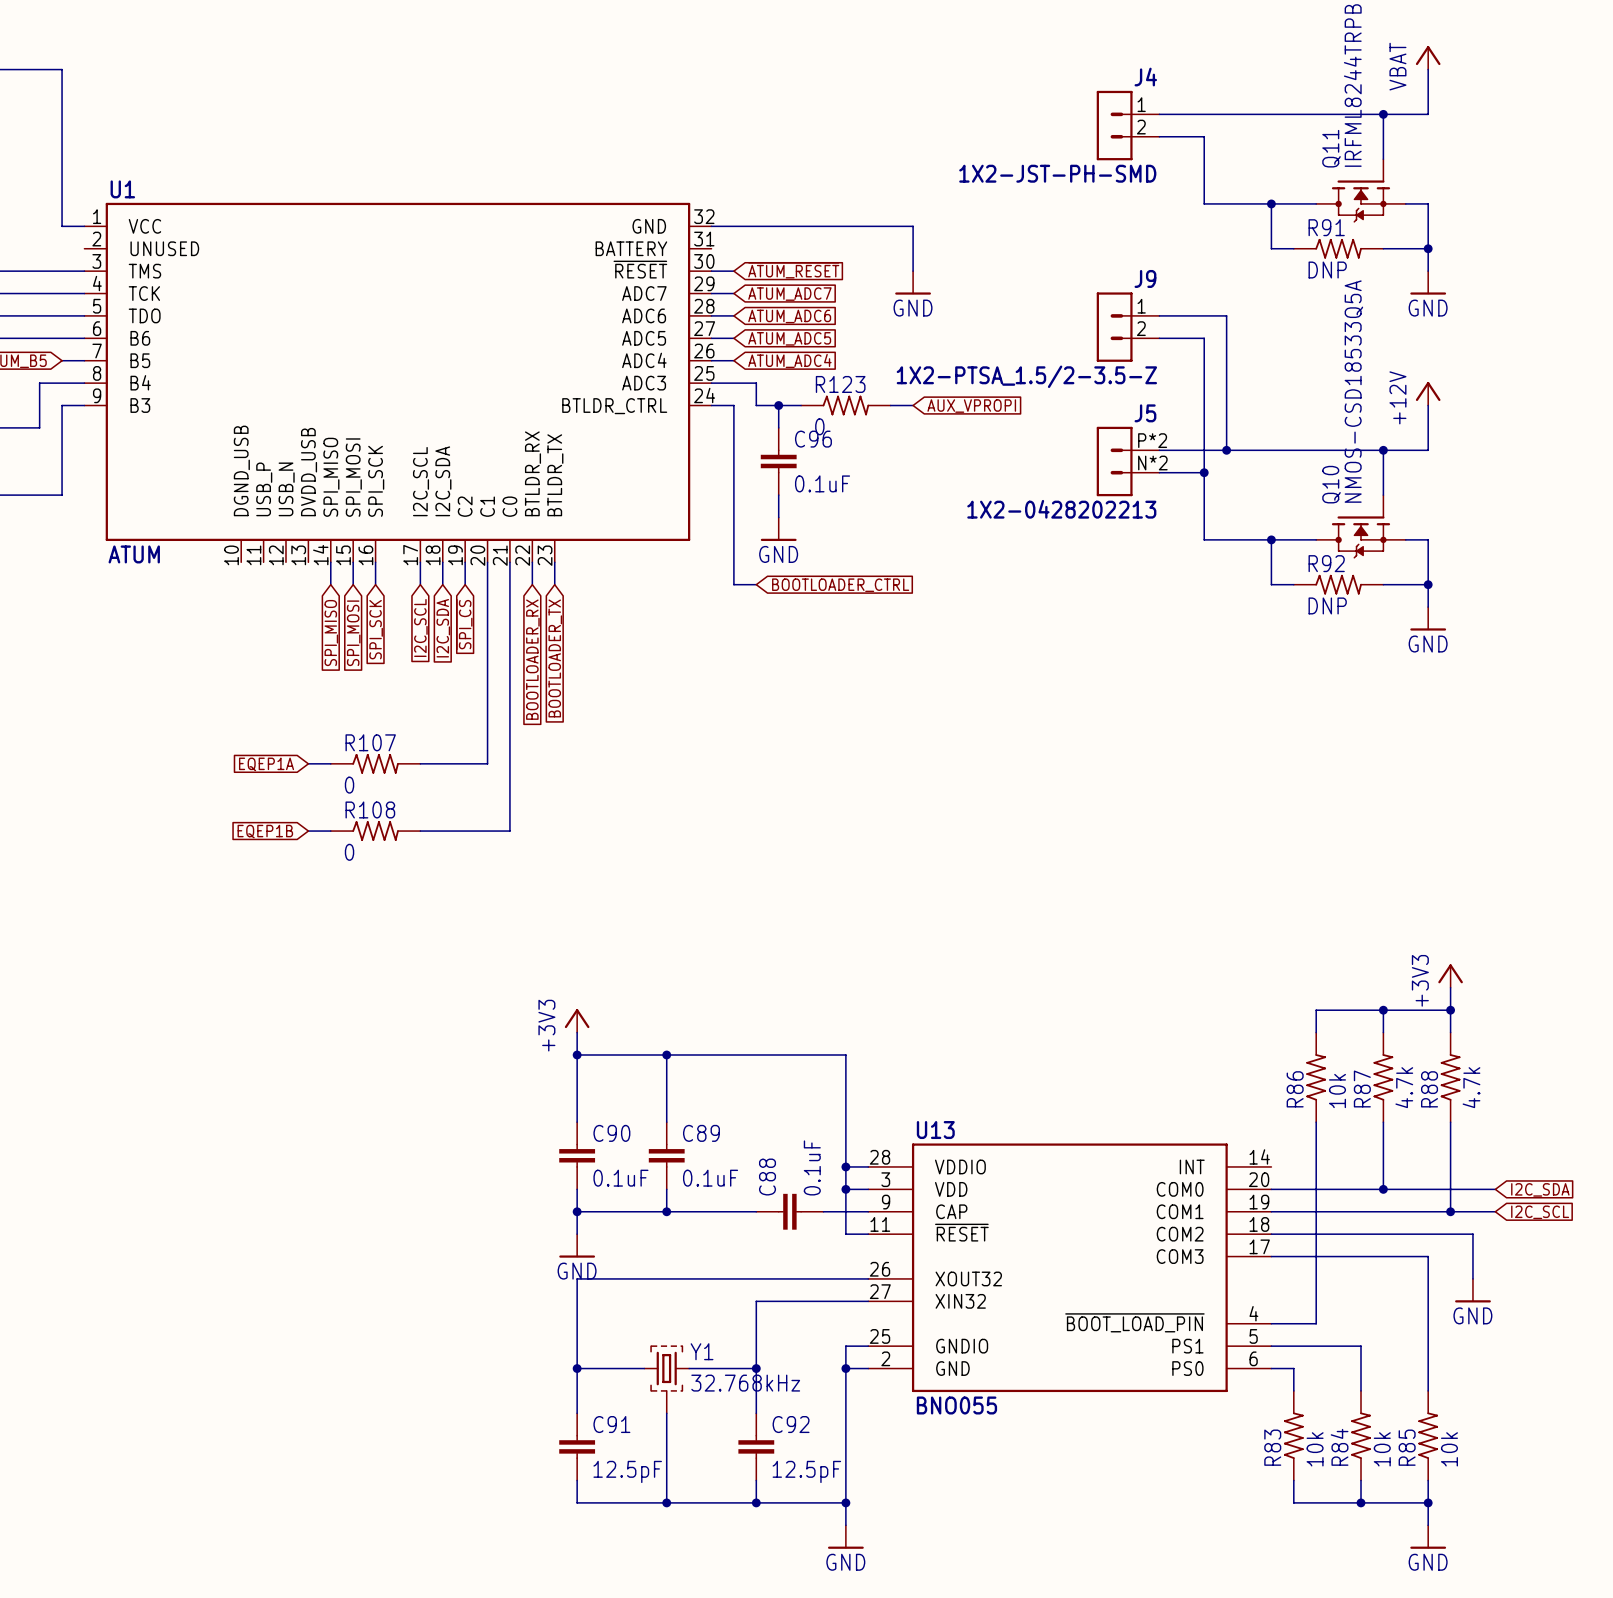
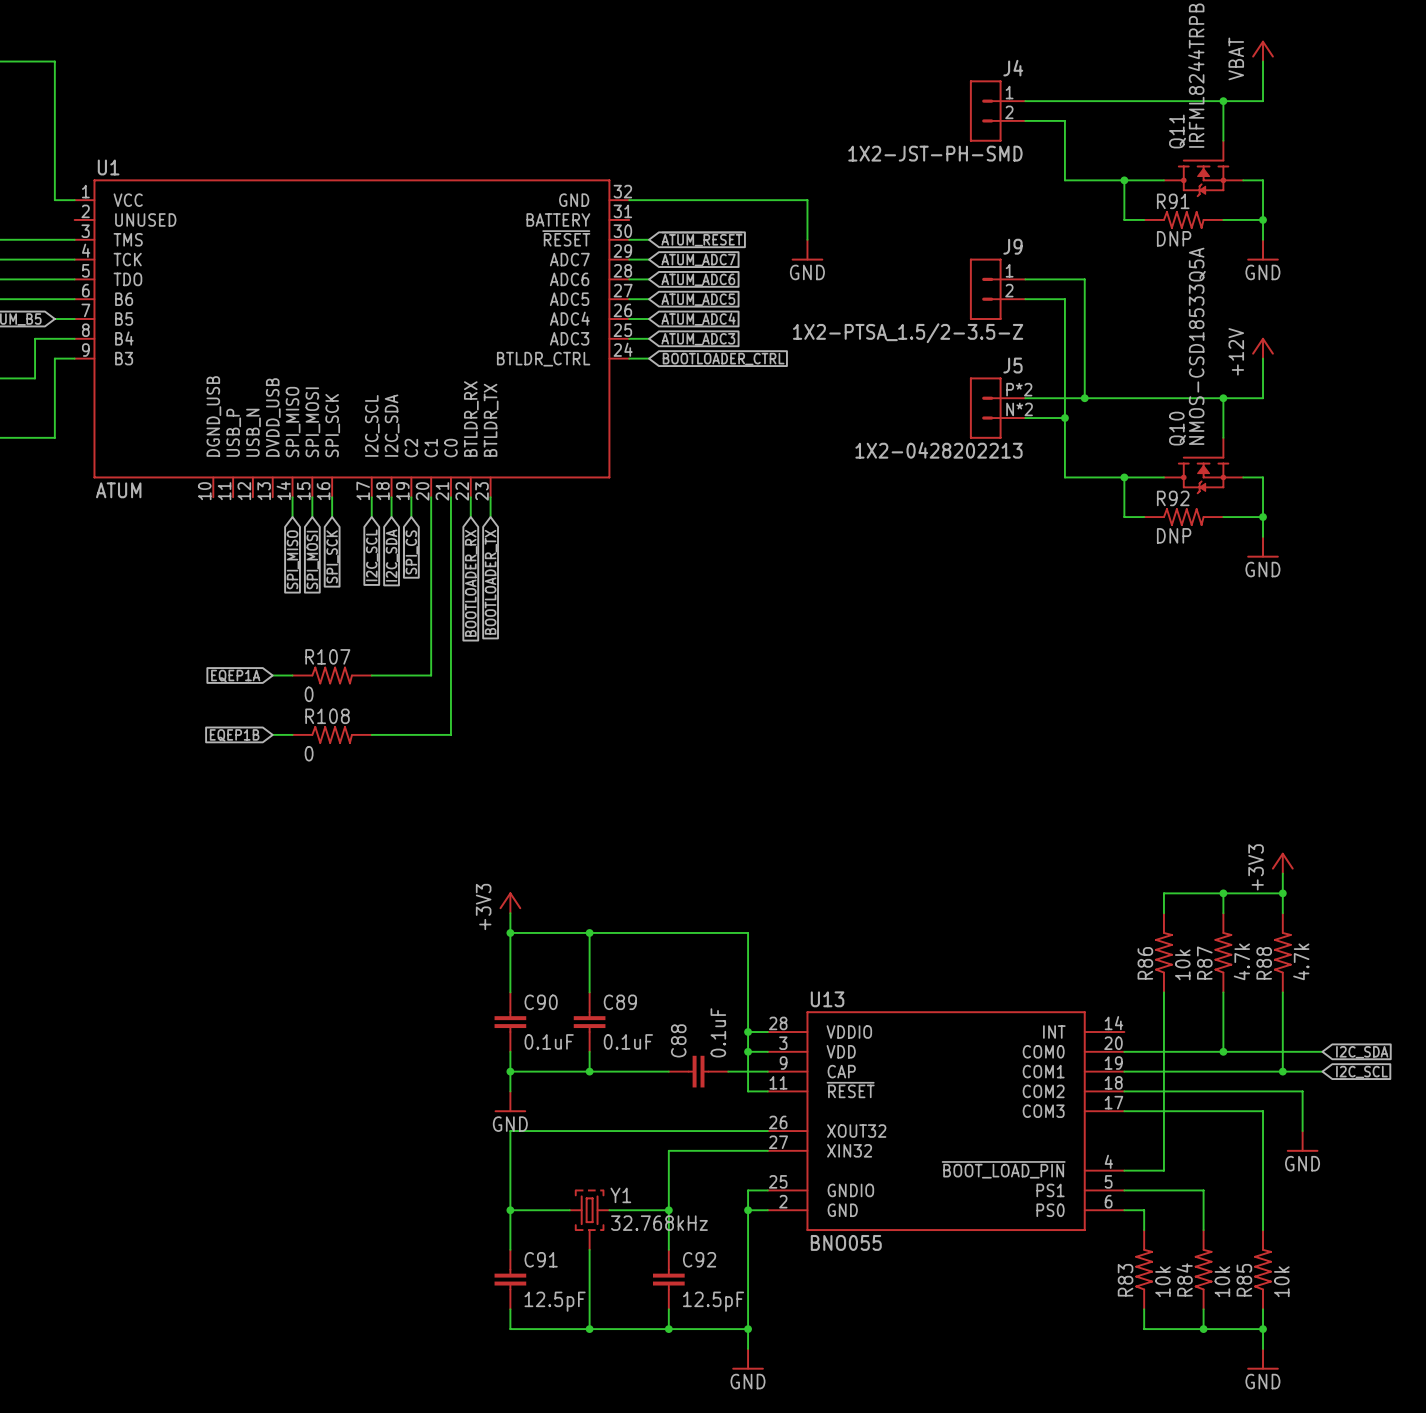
wire: (733, 383) (756, 383) (756, 405) (801, 405) -> none
global label: none -> ATUM_ADC3 (698, 339)
wire: (733, 405) (733, 584) (756, 584) -> none
wire: (778, 405) (778, 427) -> none
junction: (778, 405) -> none
R123: 0 (845, 405) -> none
wire: (890, 405) (913, 405) -> none
global label: AUX_VPROPI (971, 406) -> none
C96: 0.1uF (778, 461) -> none
wire: (778, 495) (778, 517) -> none
power symbol: GND (778, 529) -> none
global label position: BOOTLOADER_CTRL (840, 585) -> BOOTLOADER_CTRL (723, 359)

